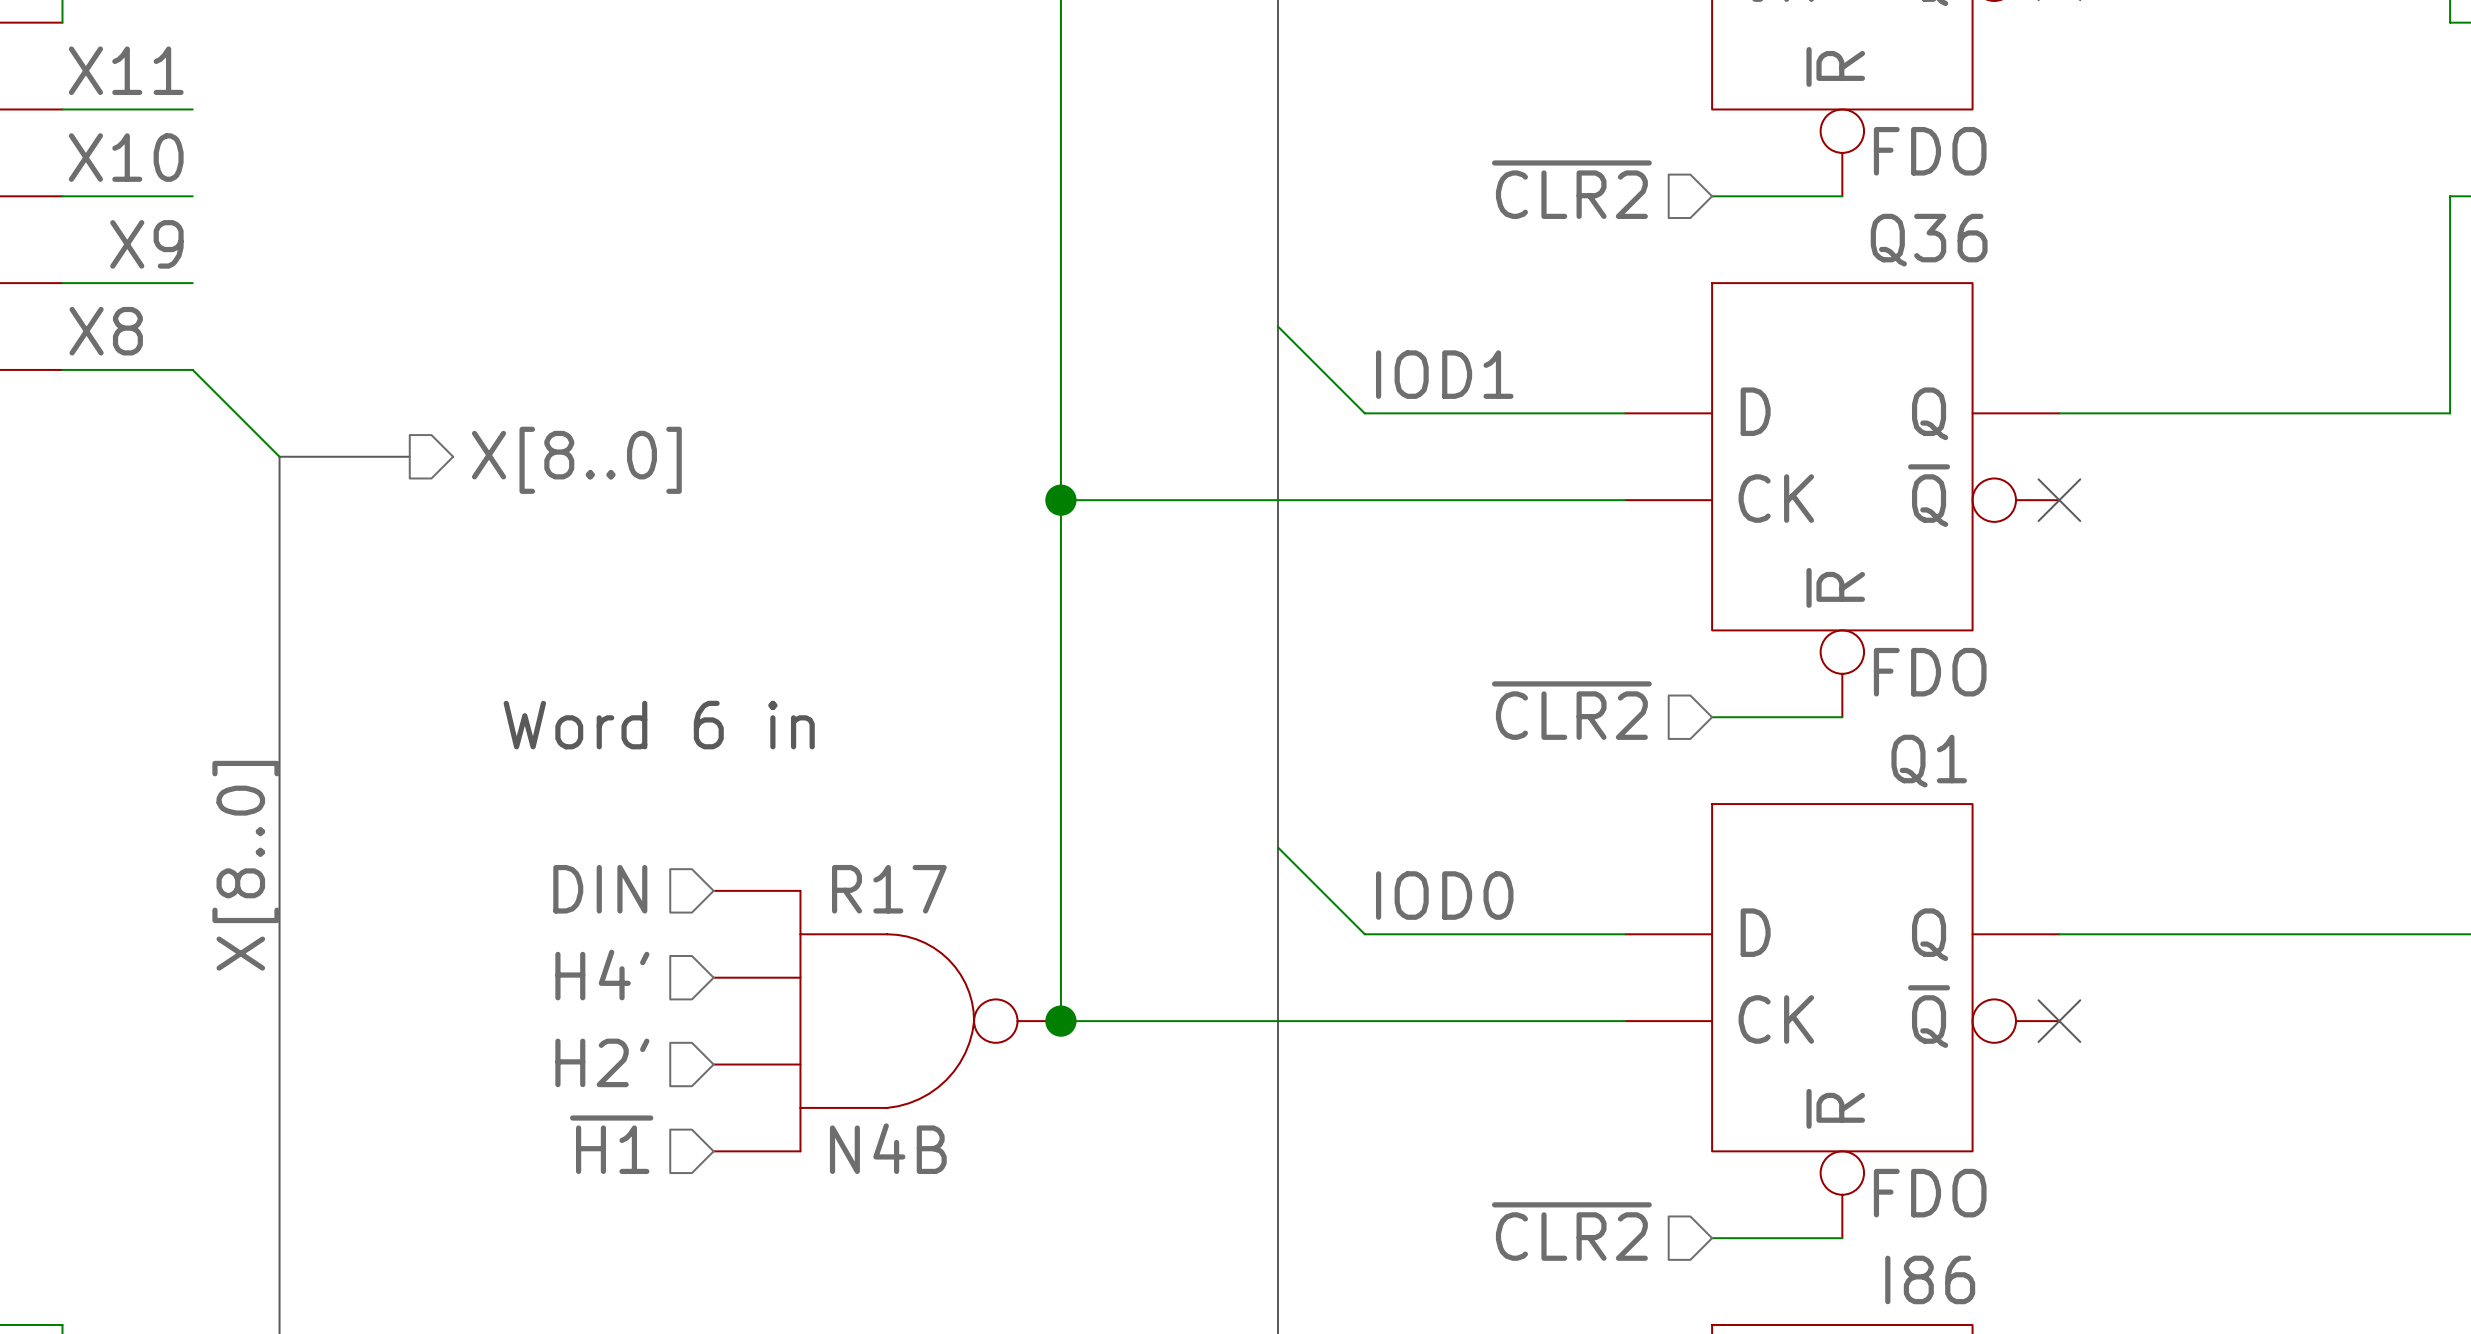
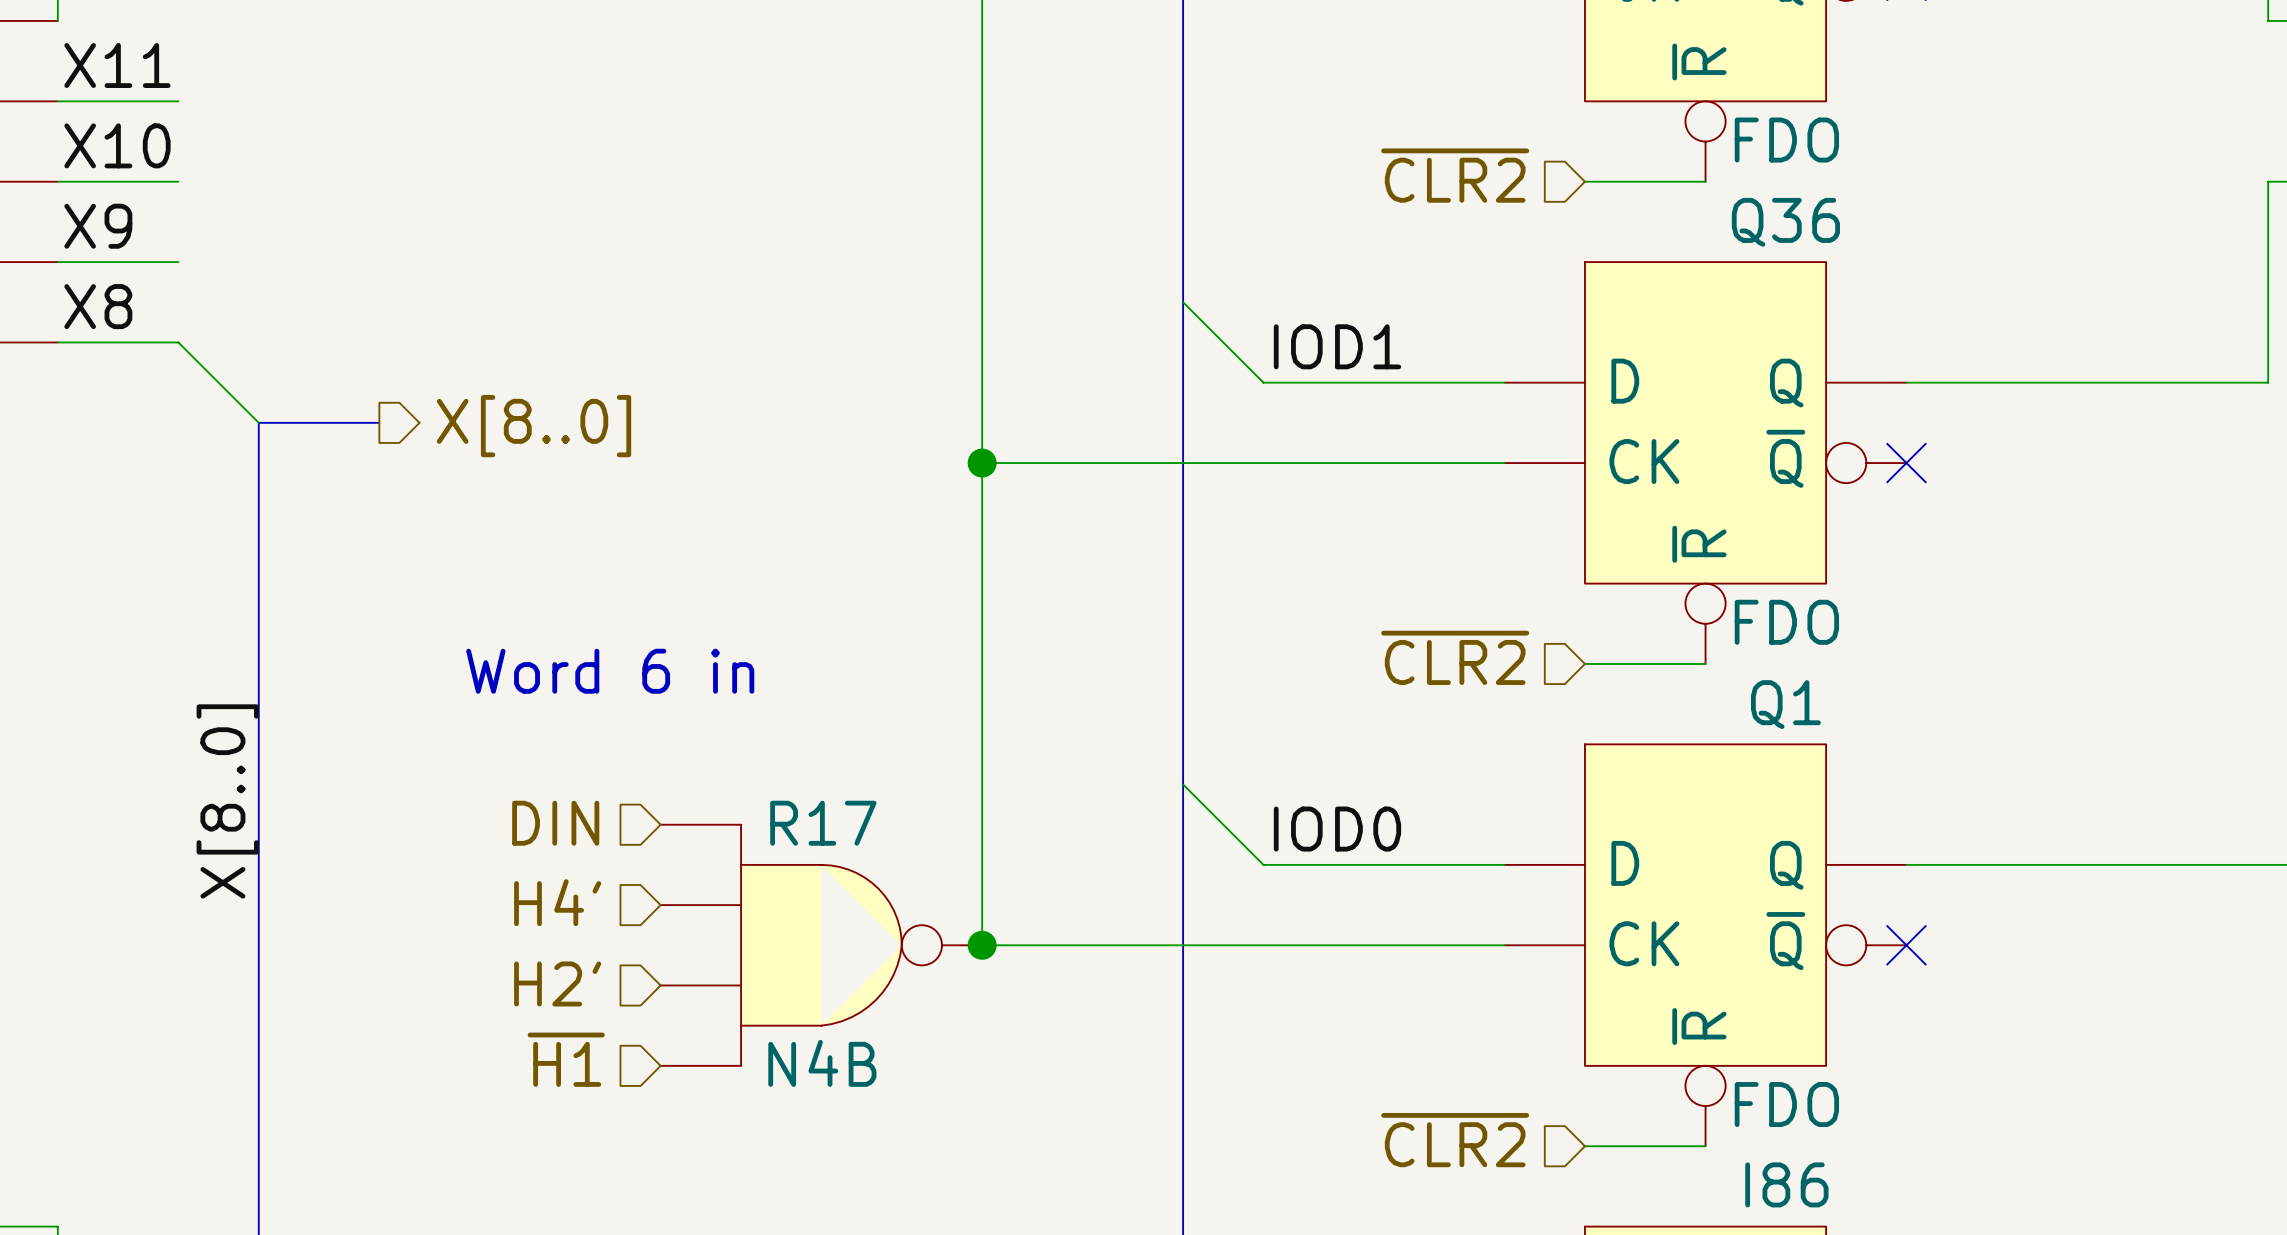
label position: X11 (126, 70) -> X11 (117, 65)
label position: X10 (126, 157) -> X10 (117, 145)
label position: X9 (146, 244) -> X9 (98, 226)

